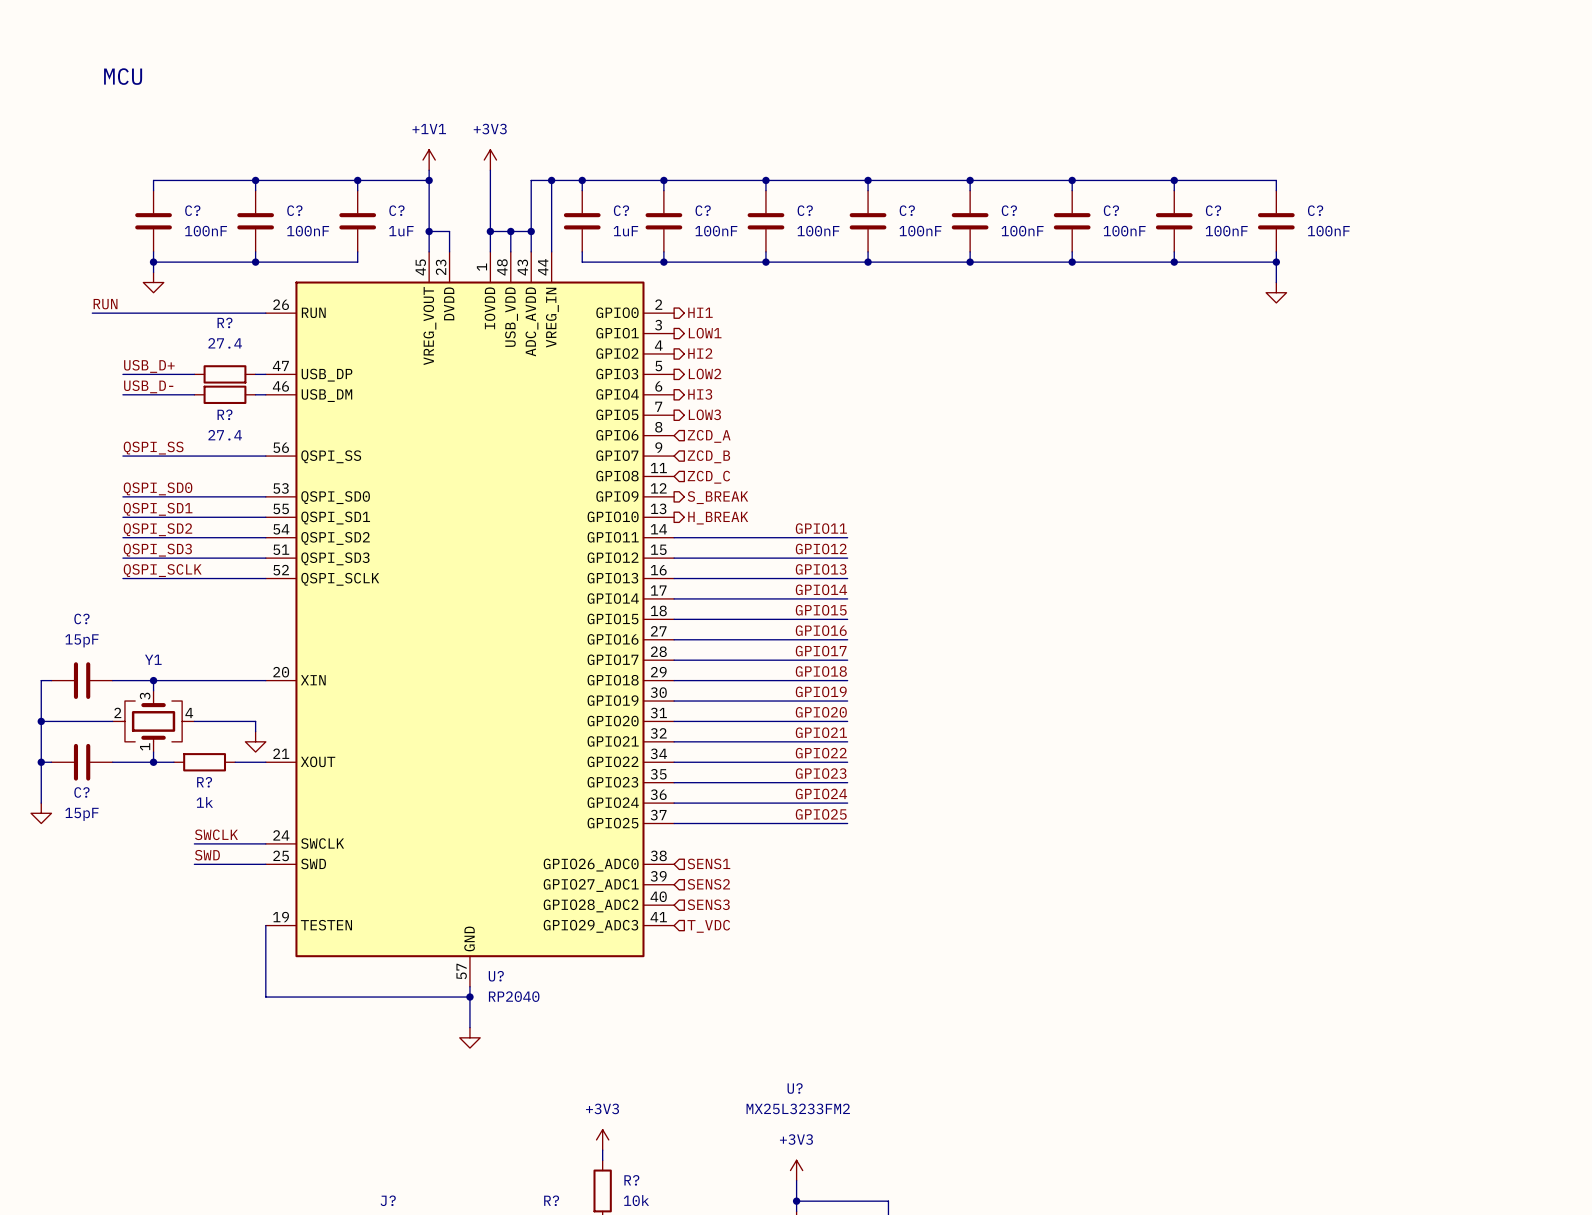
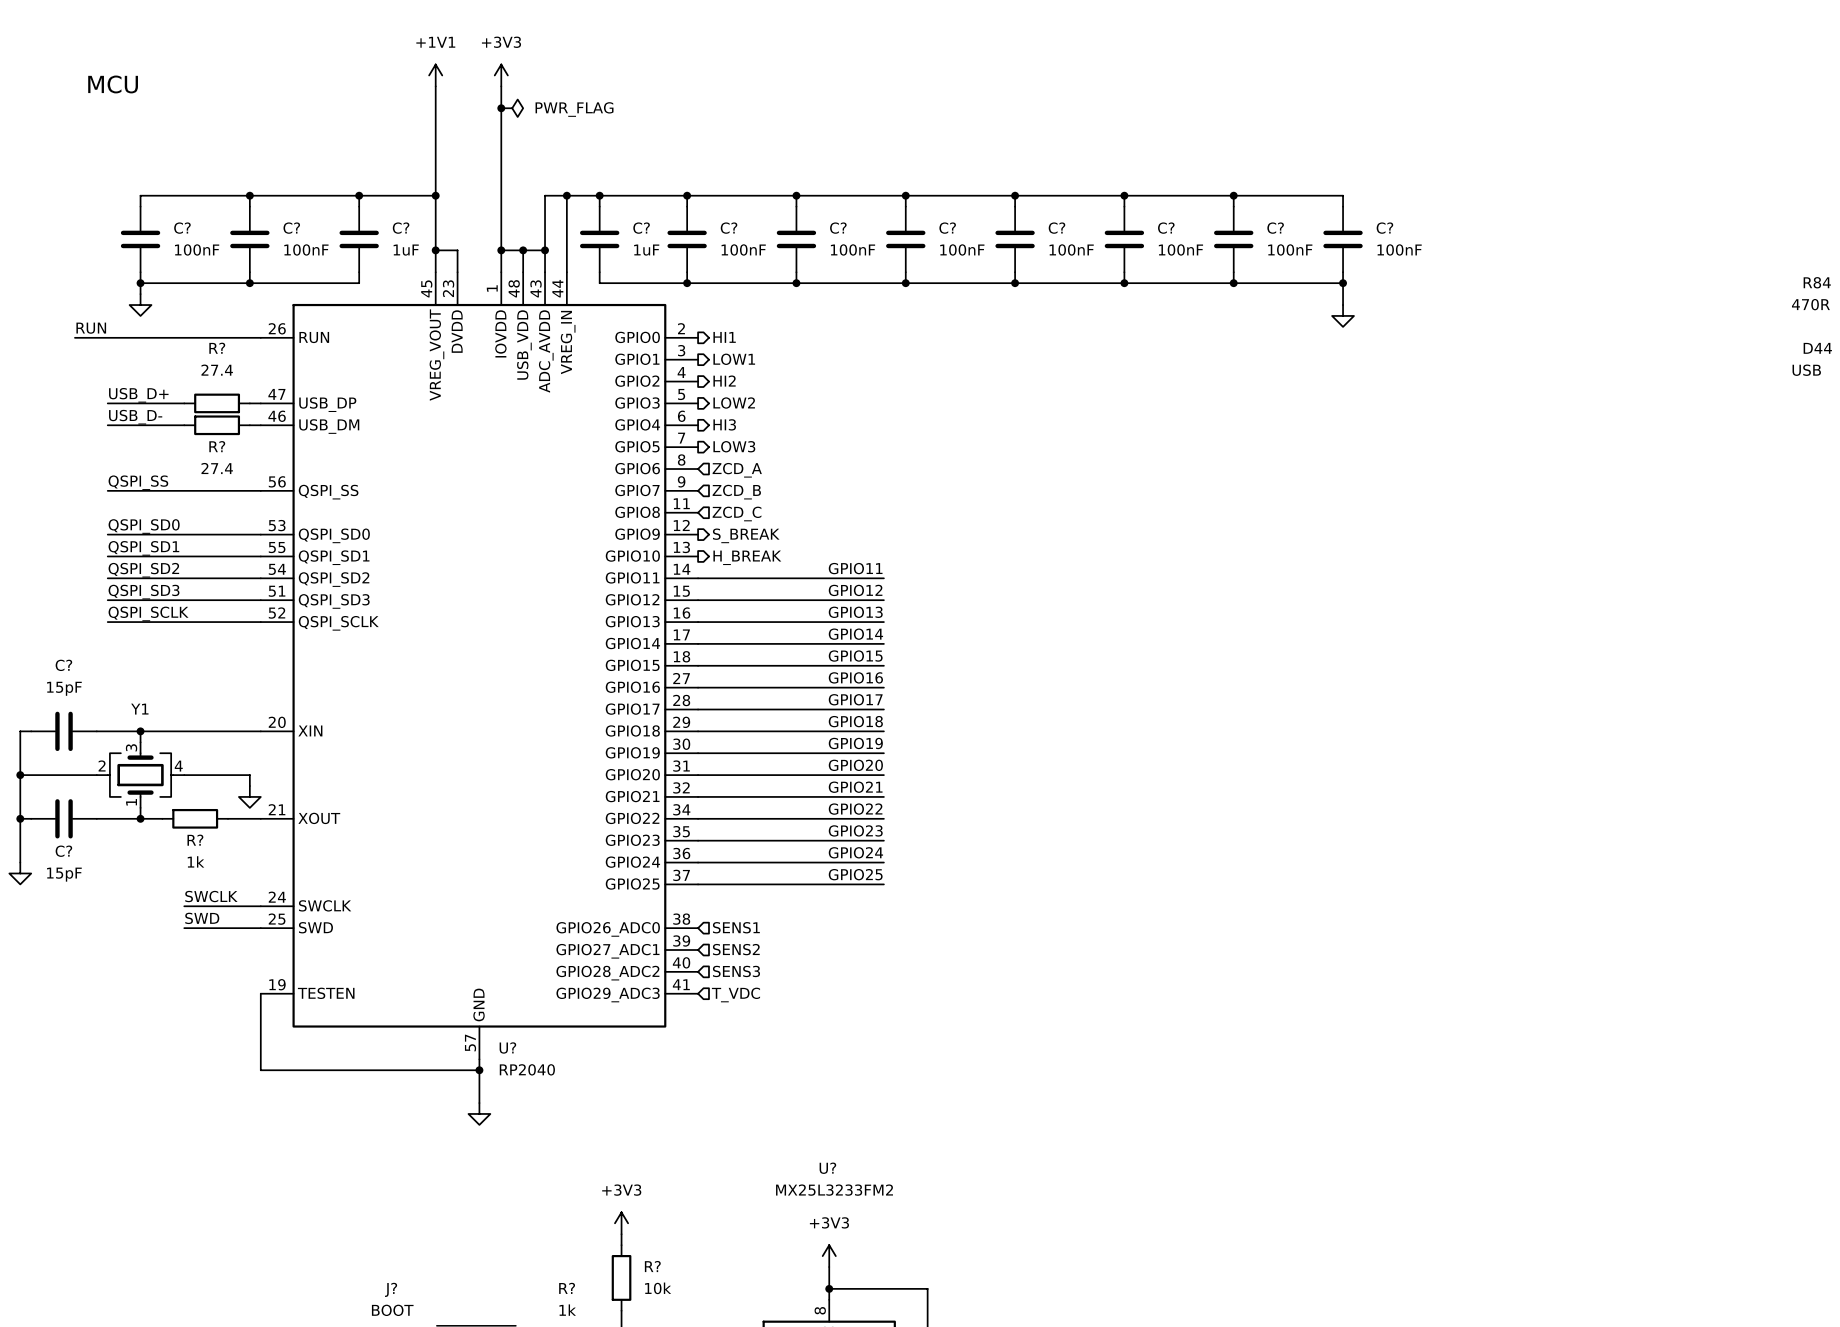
wire: none -> (435, 86) (435, 184)
wire: none -> (501, 86) (501, 184)
junction: none -> (501, 108)
power symbol: none -> PWR_FLAG (512, 108)
power symbol position: +1V1 (429, 160) -> +1V1 (435, 75)
power symbol position: +3V3 (490, 160) -> +3V3 (501, 75)

